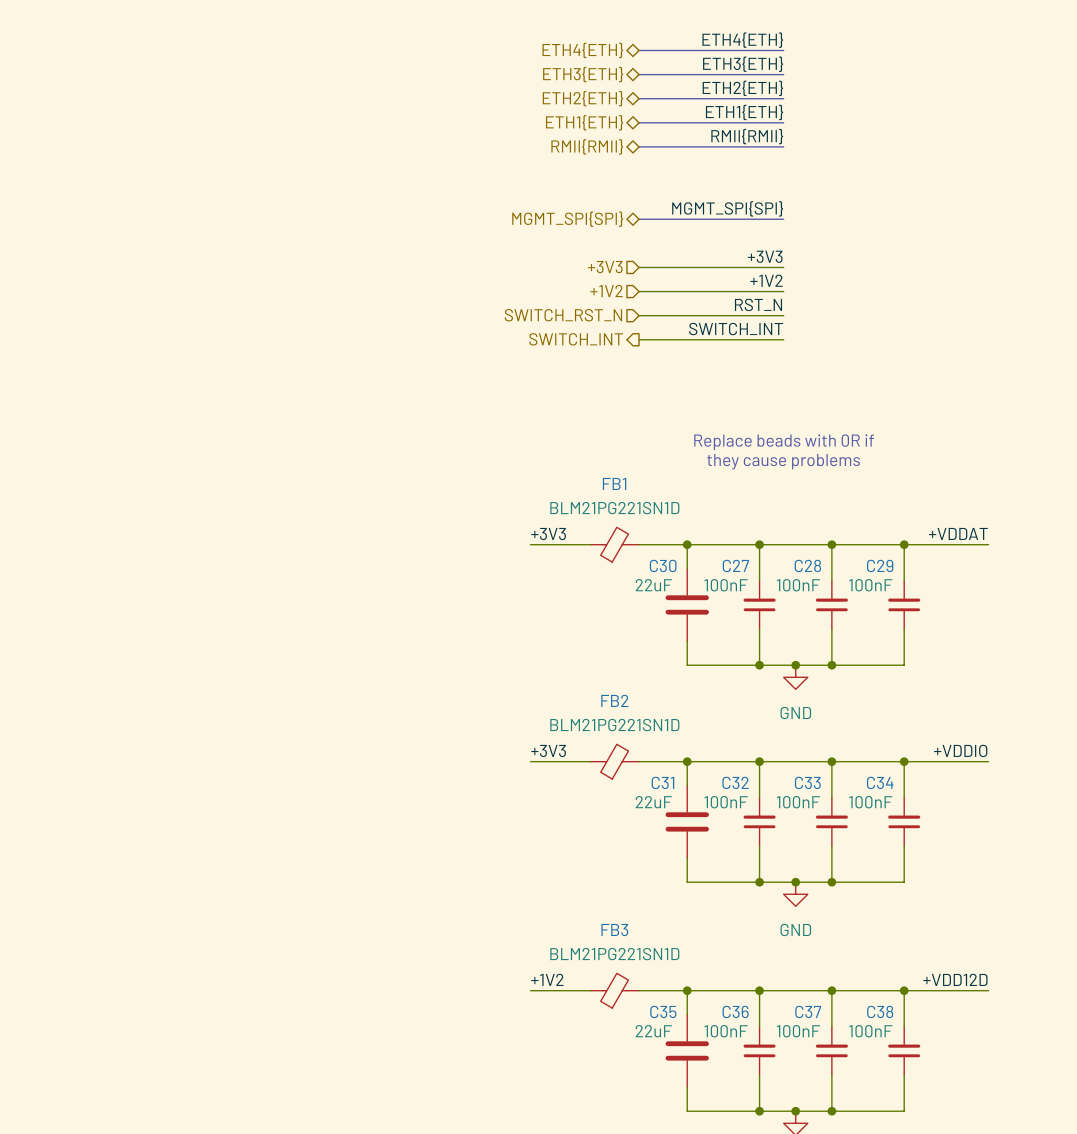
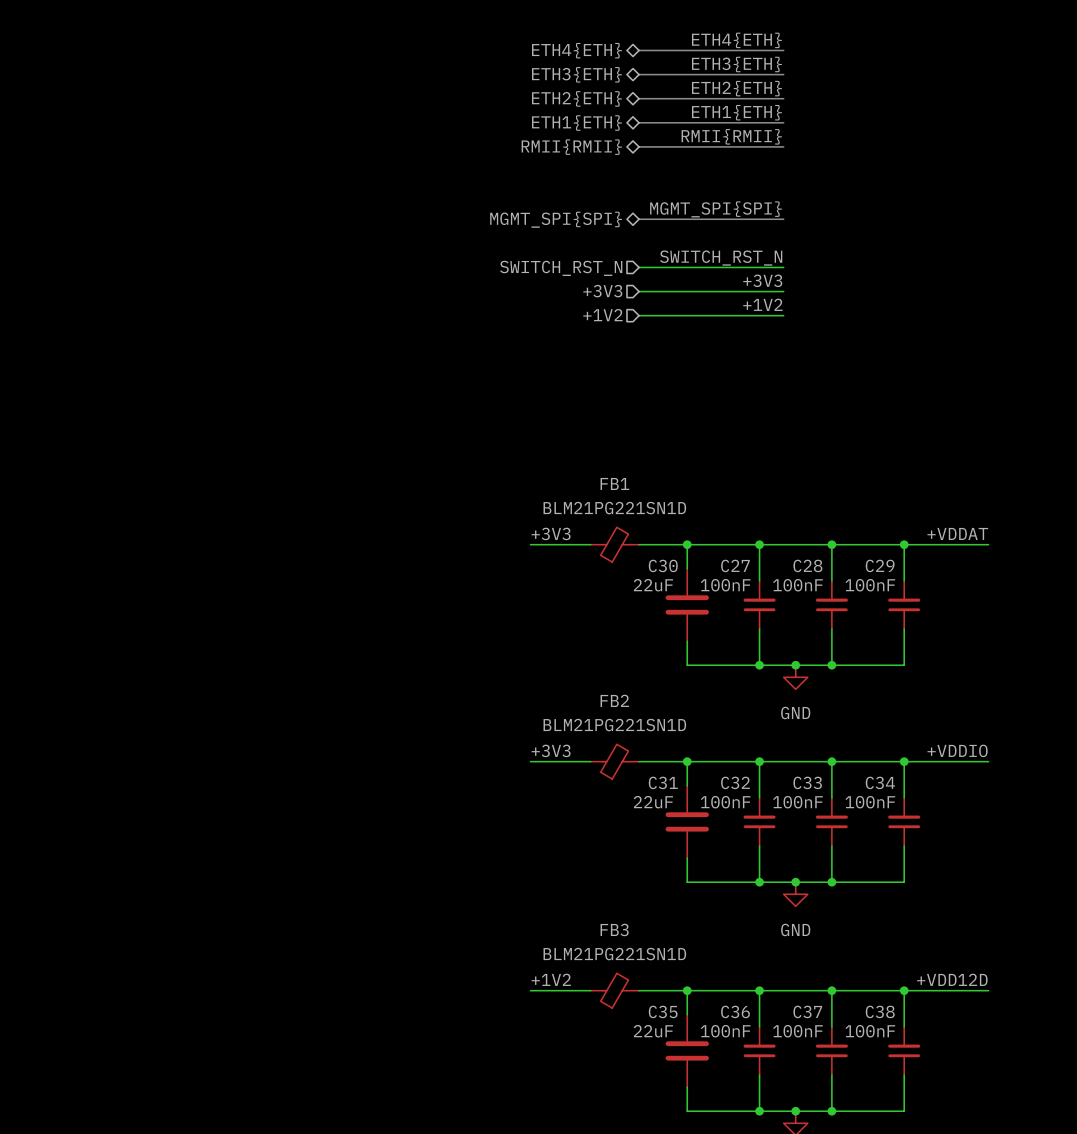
label: +3V3 (765, 256) -> SWITCH_RST_N (721, 258)
hierarchical label: +3V3 (605, 267) -> SWITCH_RST_N (561, 268)
label: +1V2 (766, 280) -> +3V3 (762, 280)
hierarchical label: +1V2 (606, 291) -> +3V3 (602, 291)
label: RST_N (758, 304) -> +1V2 (762, 304)
hierarchical label: SWITCH_RST_N (563, 315) -> +1V2 (602, 315)
label: SWITCH_INT (736, 329) -> none
hierarchical label: SWITCH_INT (576, 339) -> none
wire: (639, 339) (783, 339) -> none
text: Replace beads with 0R if (784, 442) -> none
text: they cause problems (783, 461) -> none

